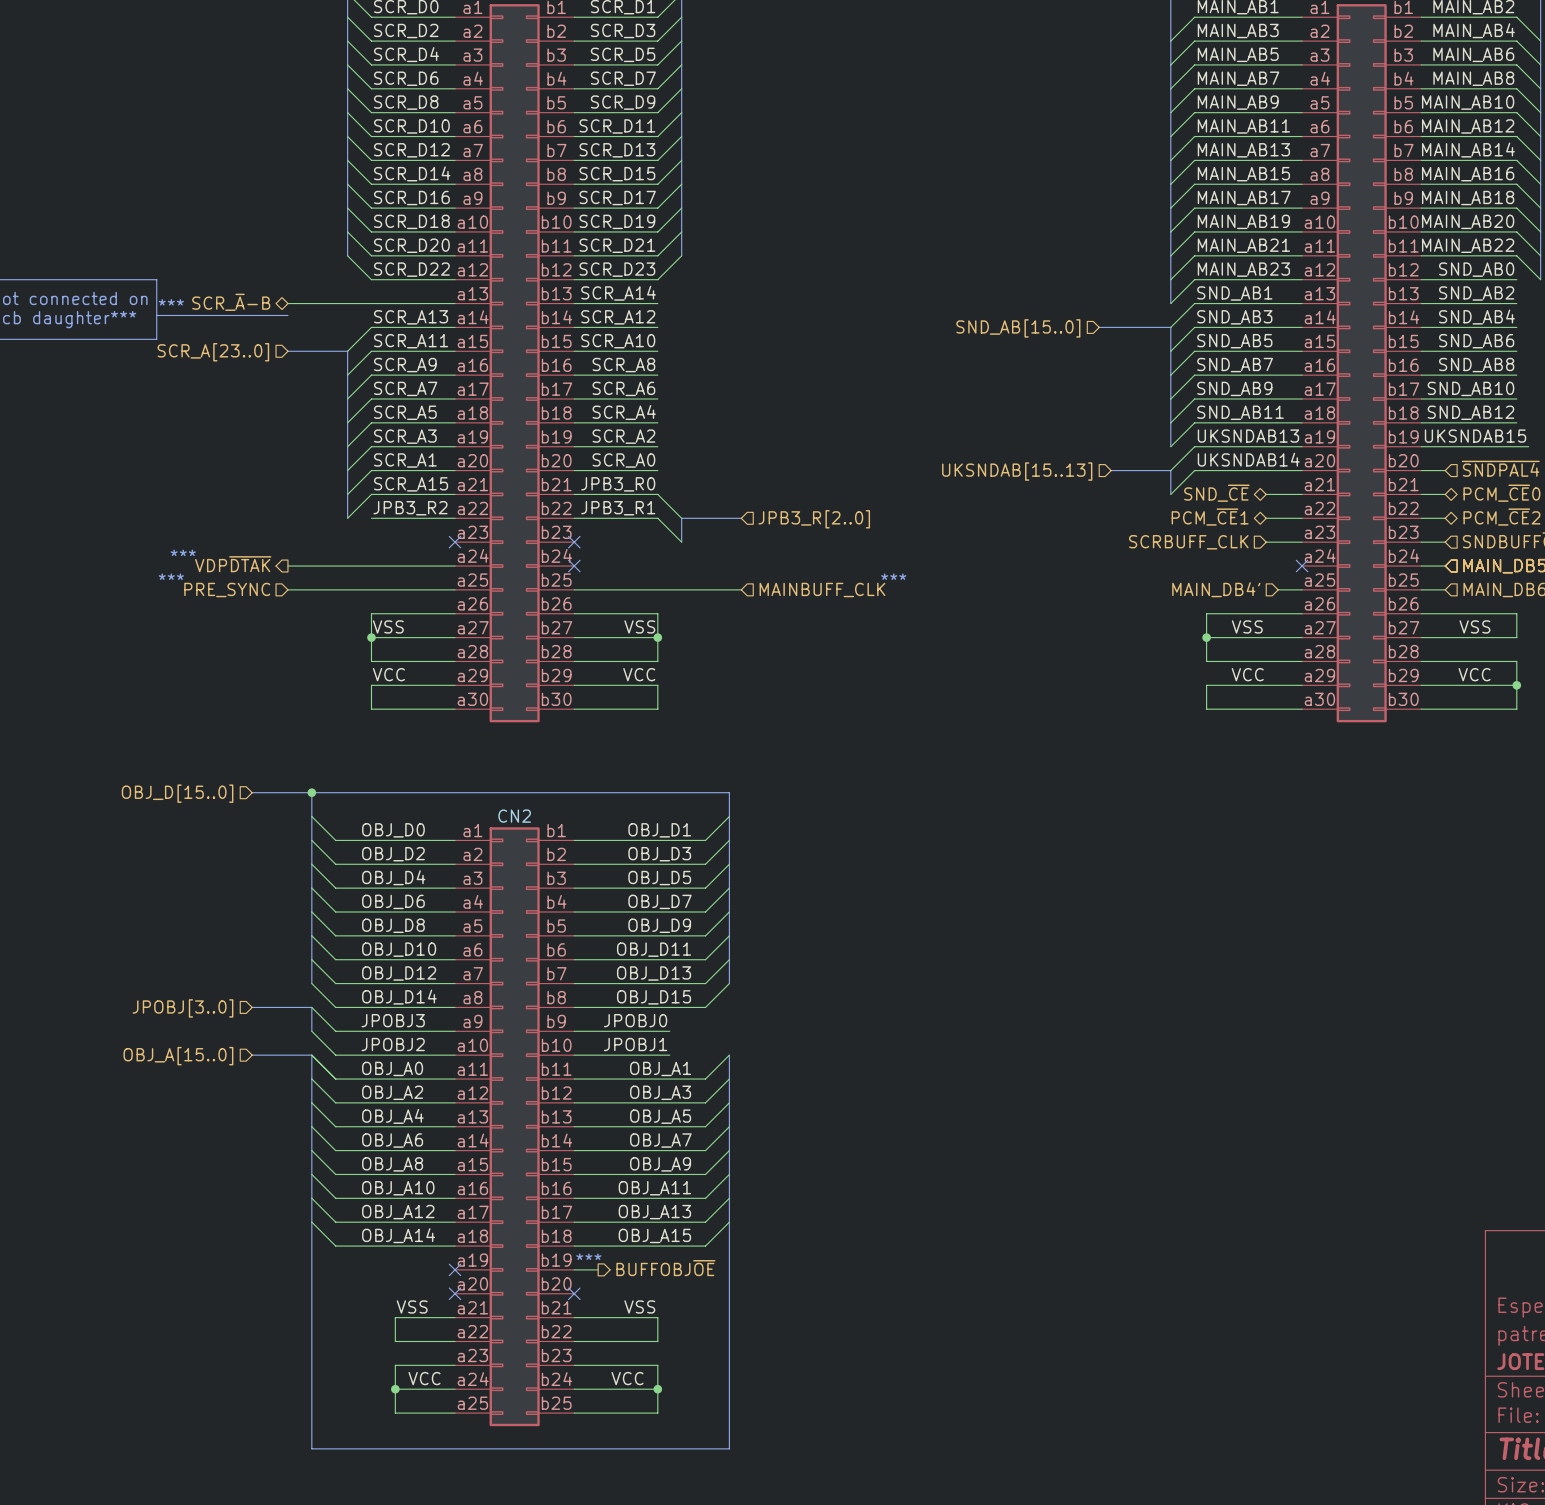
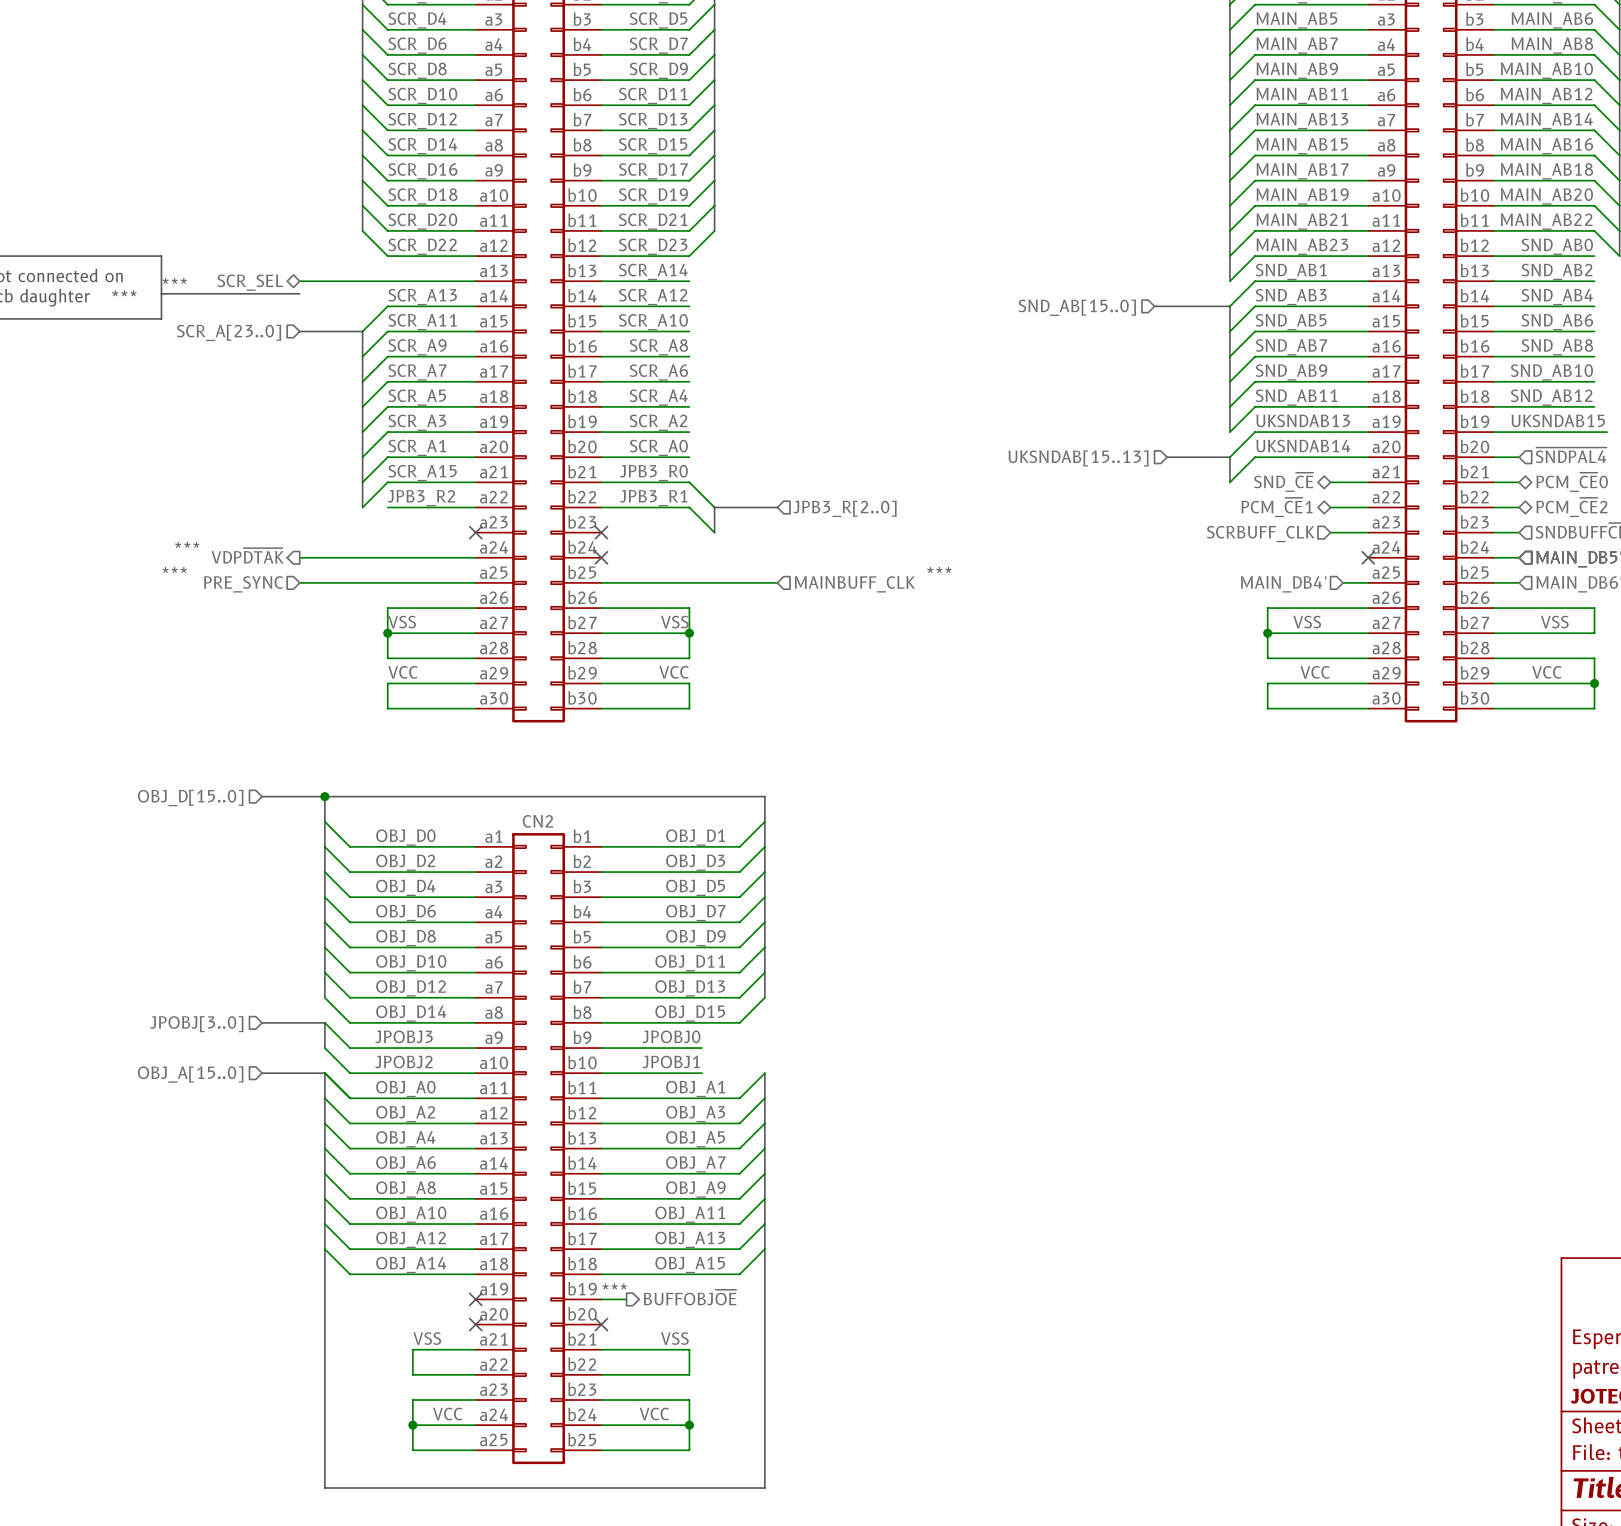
hierarchical label: SCR_~{A}-B (231, 302) -> SCR_SEL (250, 282)

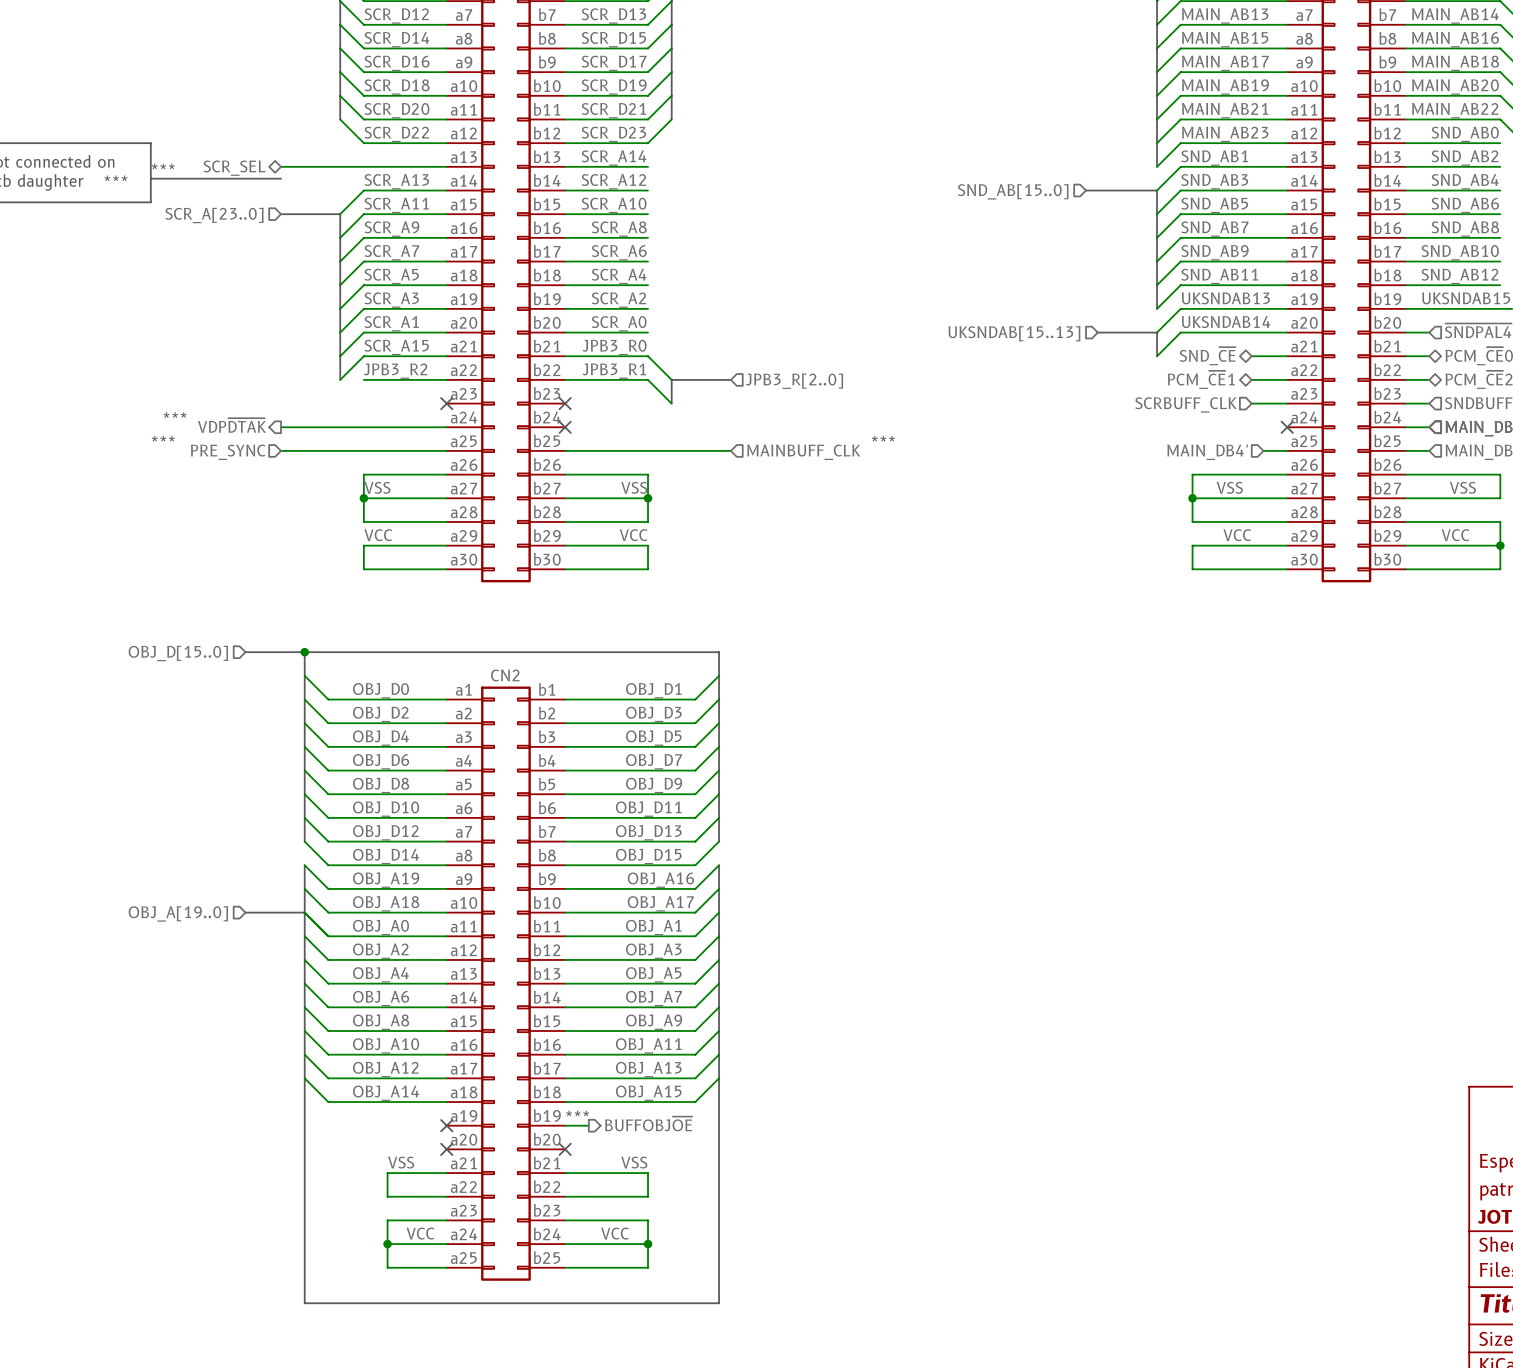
bus: (262, 1022) (324, 1022) -> none
wire: none -> (719, 865) (695, 888) (659, 888)
bus: none -> (719, 865) (719, 912)
hierarchical label: JPOBJ[3..0] (196, 1024) -> none
label: JPOBJ3 (403, 1036) -> OBJ_A19 (386, 880)
label: JPOBJ0 (671, 1036) -> none
label: none -> OBJ_A16 (660, 880)
bus: none -> (304, 888) (304, 912)
wire: none -> (719, 888) (695, 912) (659, 912)
label: JPOBJ2 (403, 1062) -> OBJ_A18 (386, 903)
label: JPOBJ1 (671, 1062) -> none
label: none -> OBJ_A17 (660, 903)
hierarchical label: OBJ_A[15..0] (190, 1074) -> OBJ_A[19..0] (178, 913)

